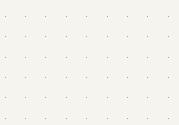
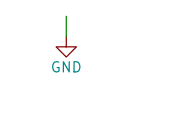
wire: none -> (66, 16) (66, 36)
power symbol: none -> GND (66, 46)

